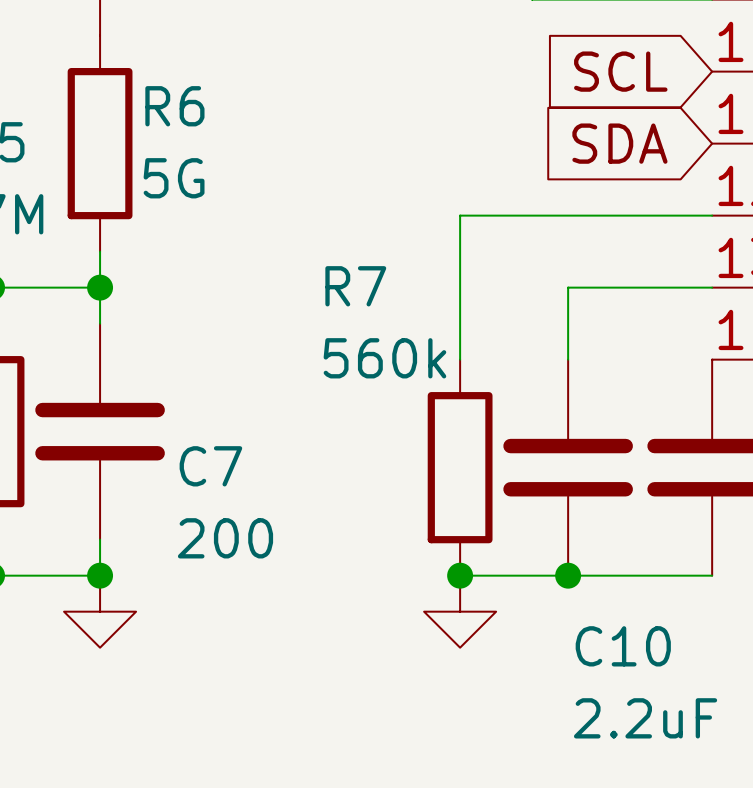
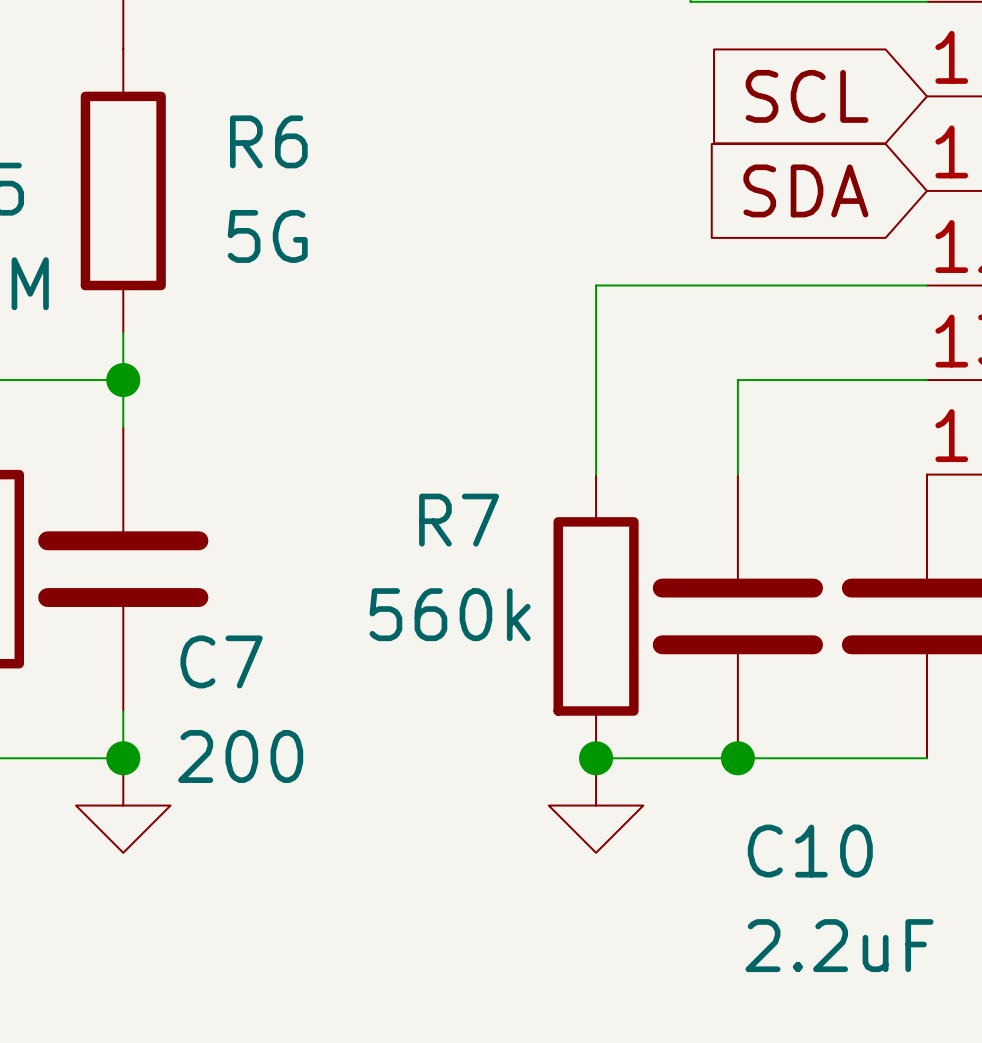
R6 name position: R6 (174, 106) -> R6 (268, 141)
R6 value position: 5G (174, 178) -> 5G (267, 236)
R7 name position: R7 (355, 286) -> R7 (459, 520)
R7 value position: 560k (384, 358) -> 560k (450, 614)
C7 name position: C7 (210, 466) -> C7 (221, 661)
C7 value position: 200 (225, 538) -> 200 (240, 756)

